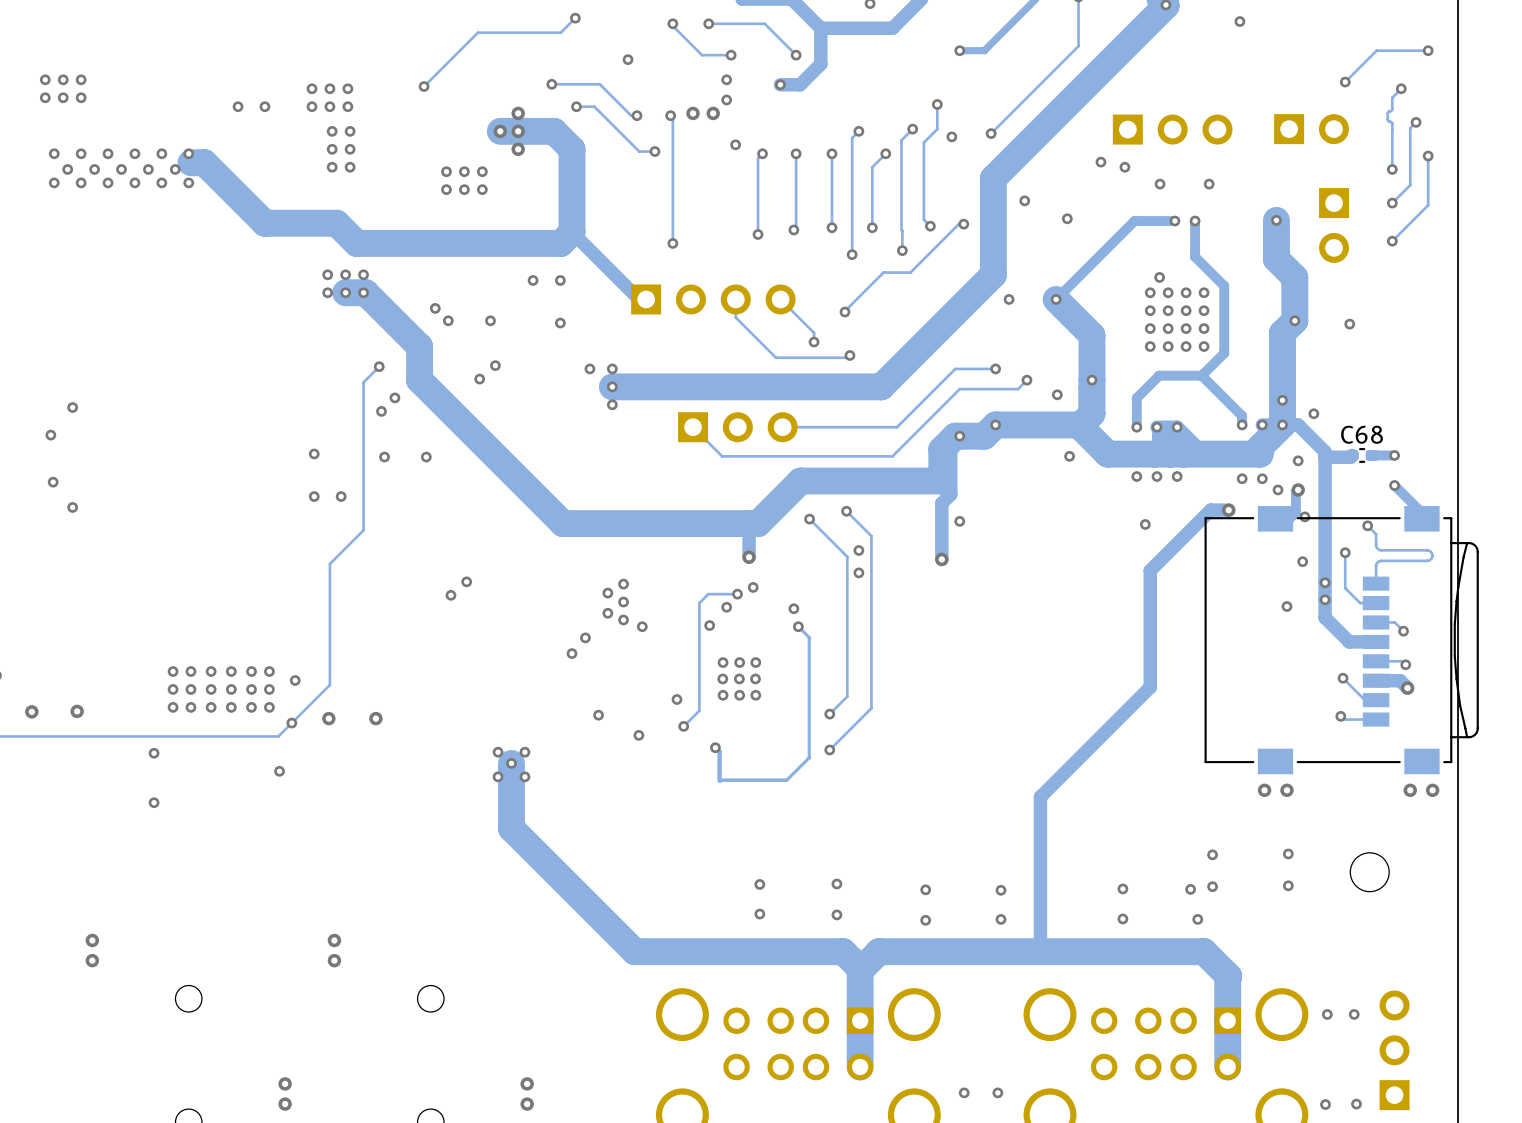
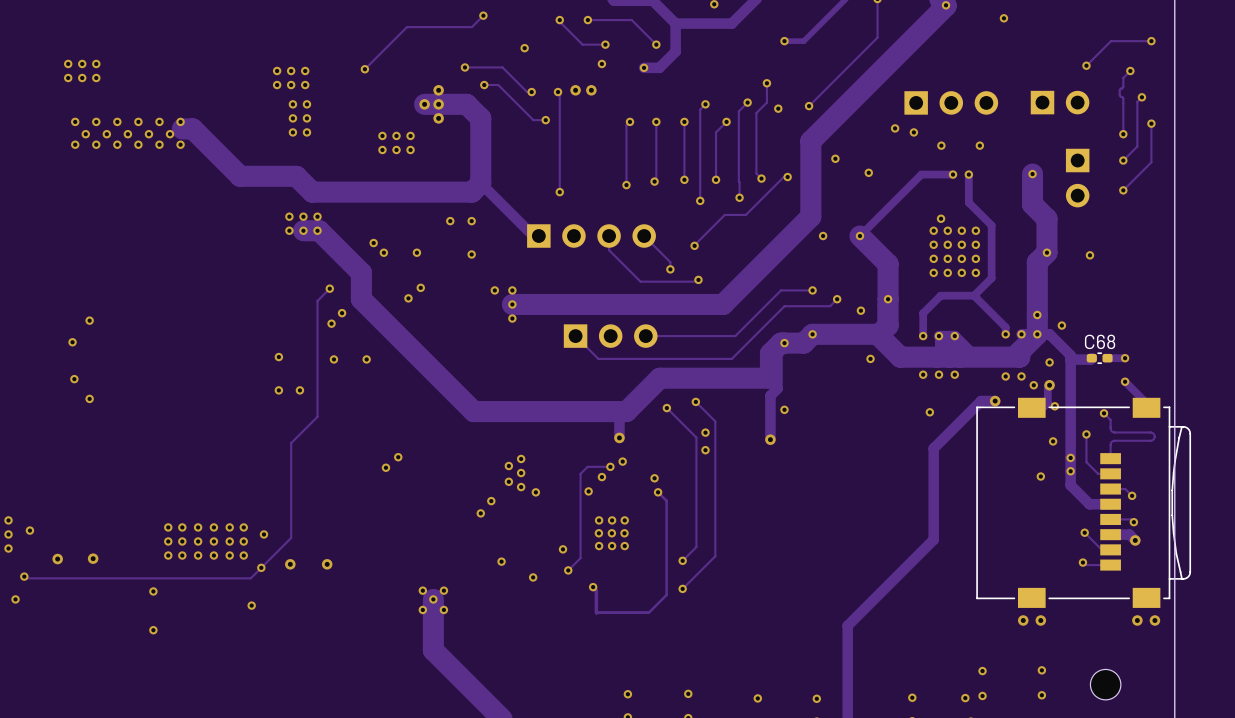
via: (726, 99) -> none
via: (238, 106) -> none
via: (264, 106) -> none
via: (735, 144) -> none

